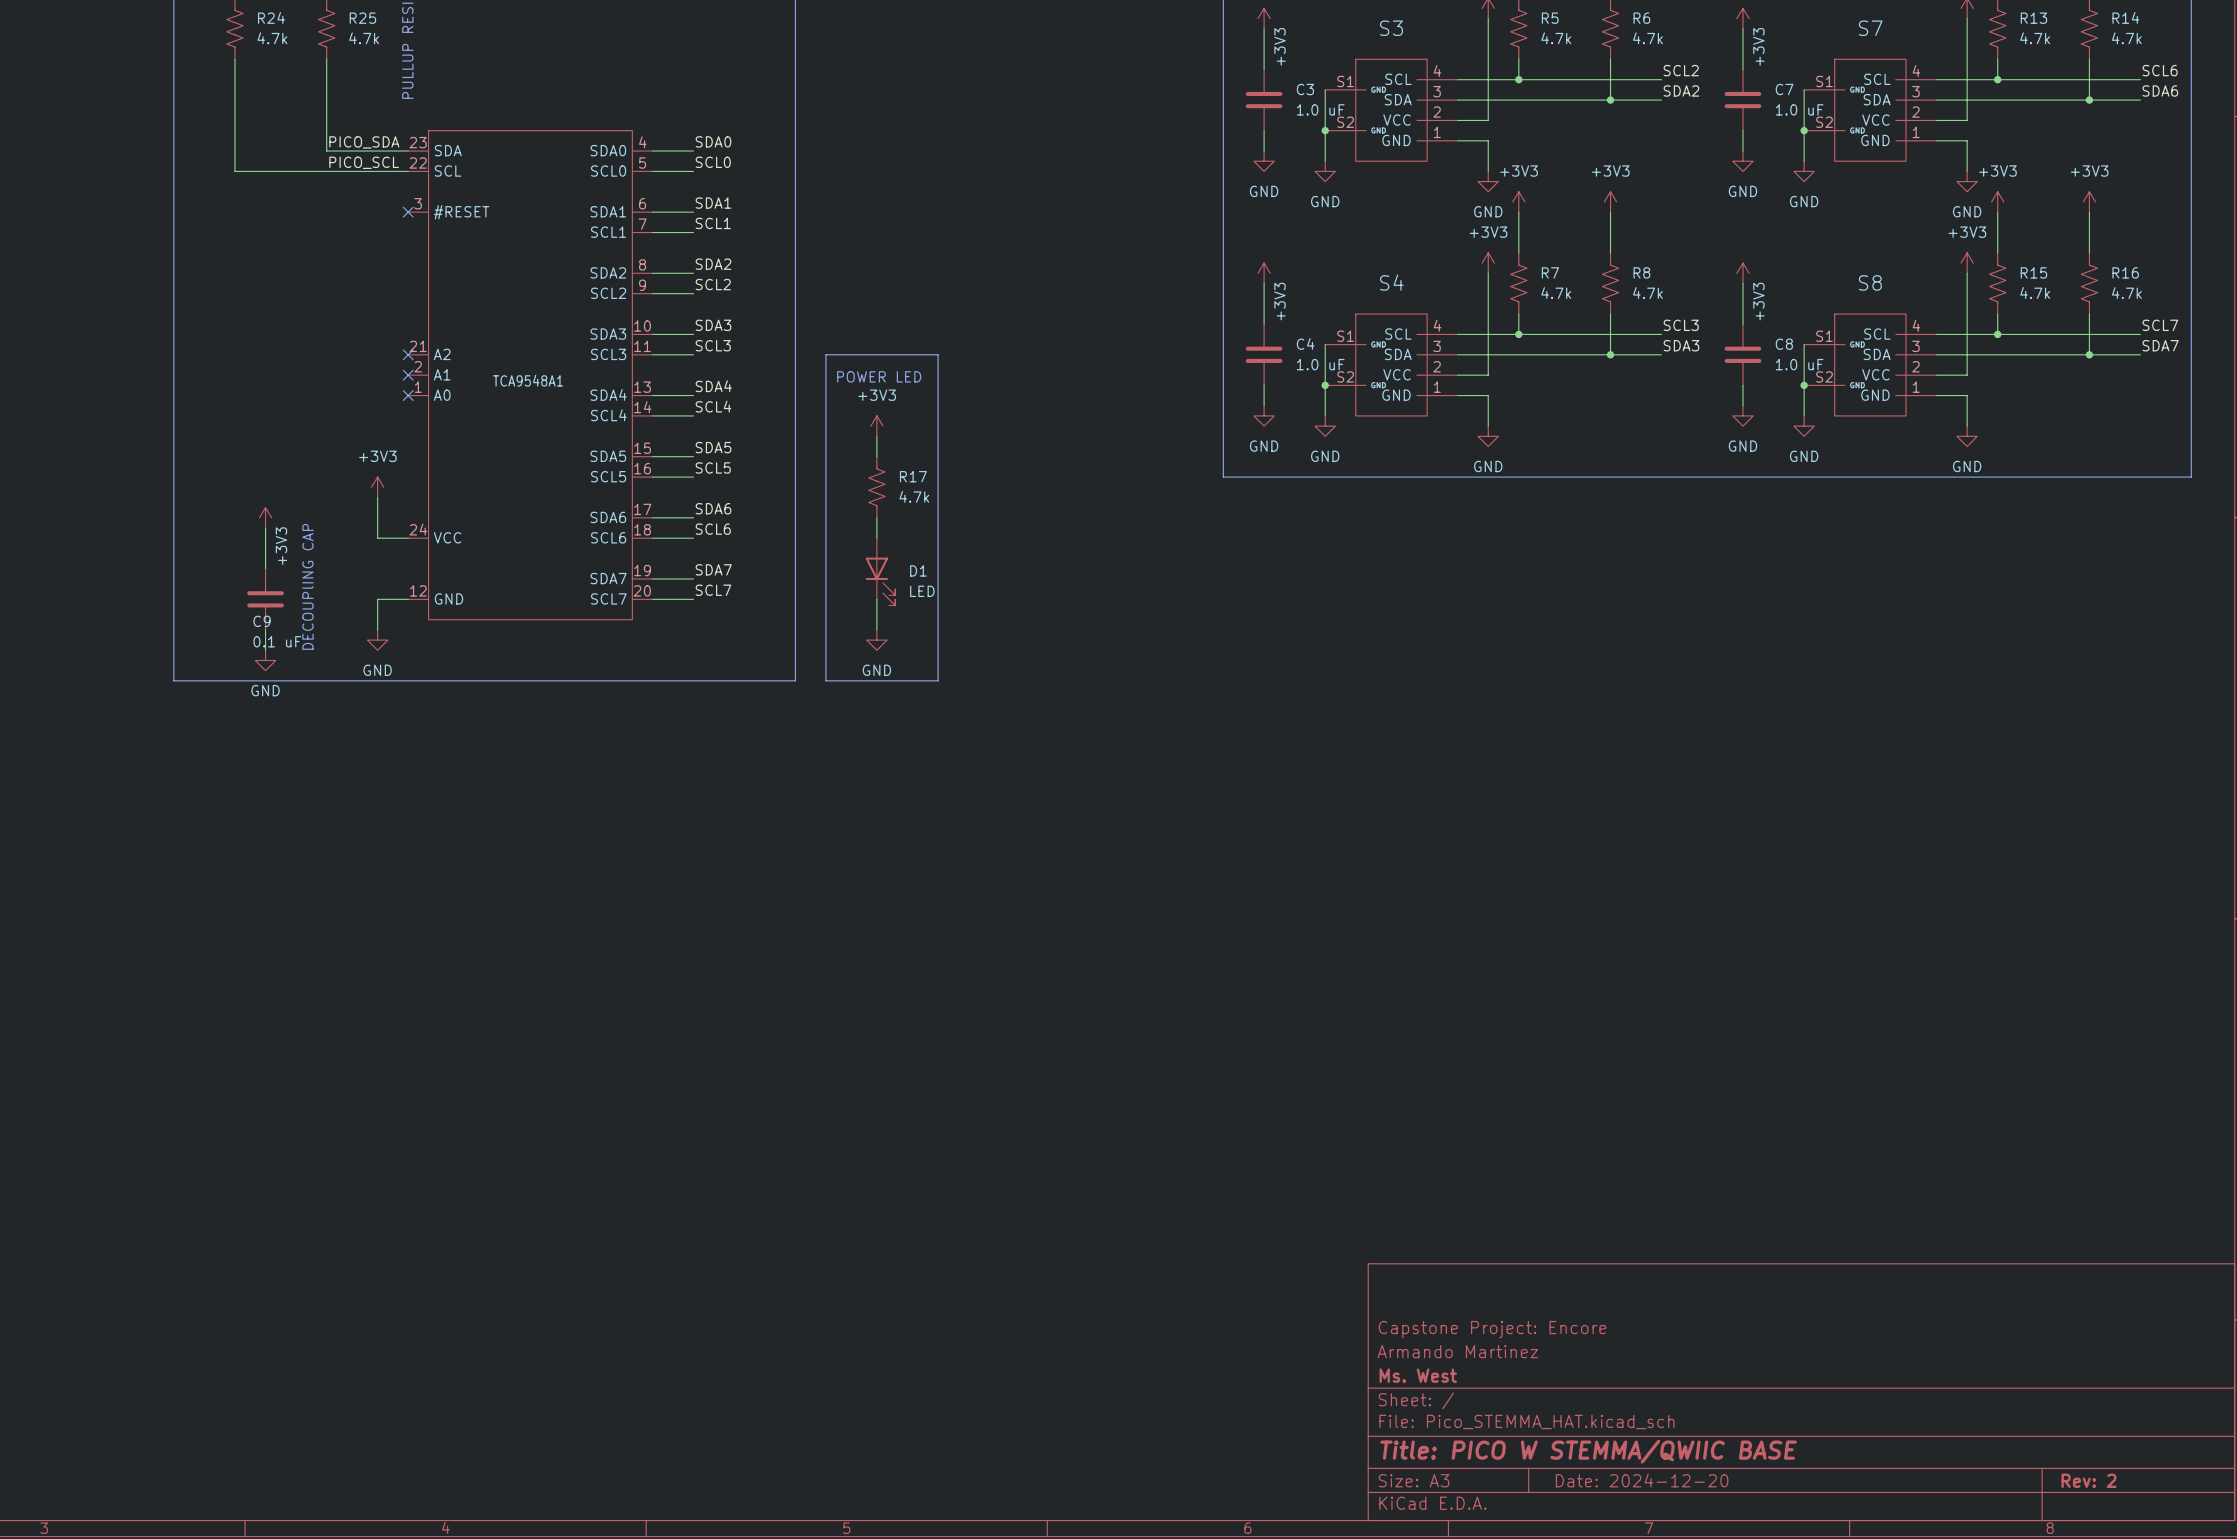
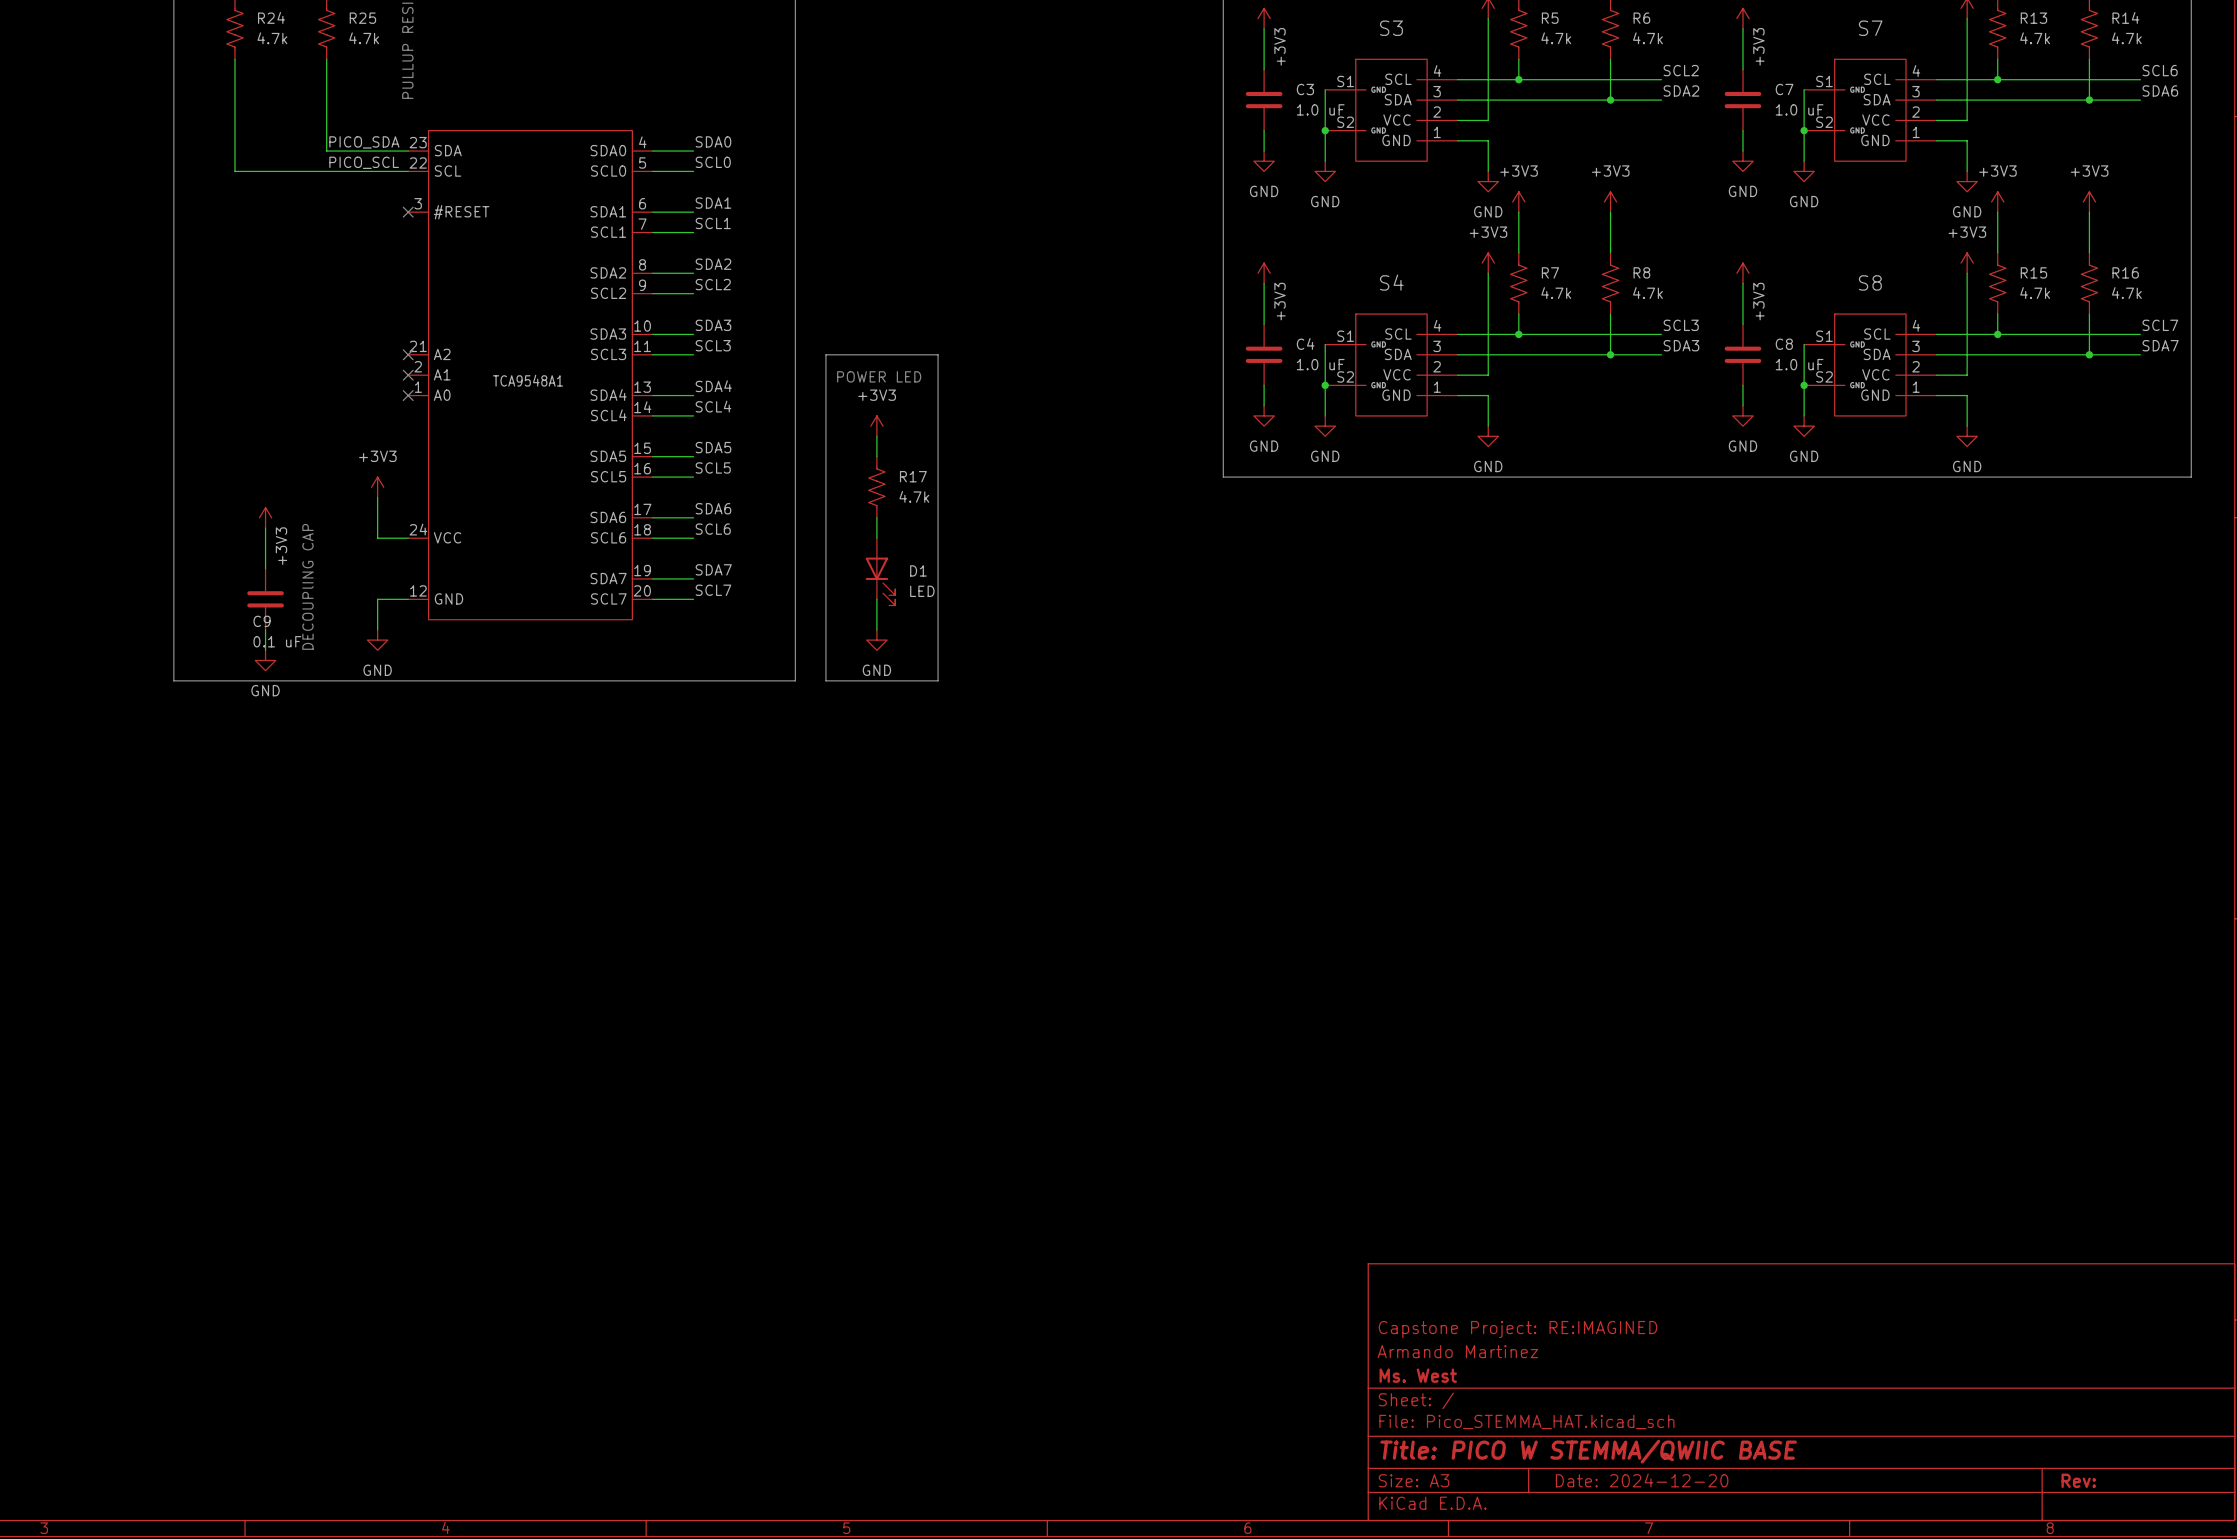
title block: Capstone Project: Encore (1492, 1329) -> Capstone Project: RE:IMAGINED (1518, 1329)
title block: Rev: 2 (2089, 1480) -> Rev: (2078, 1480)

